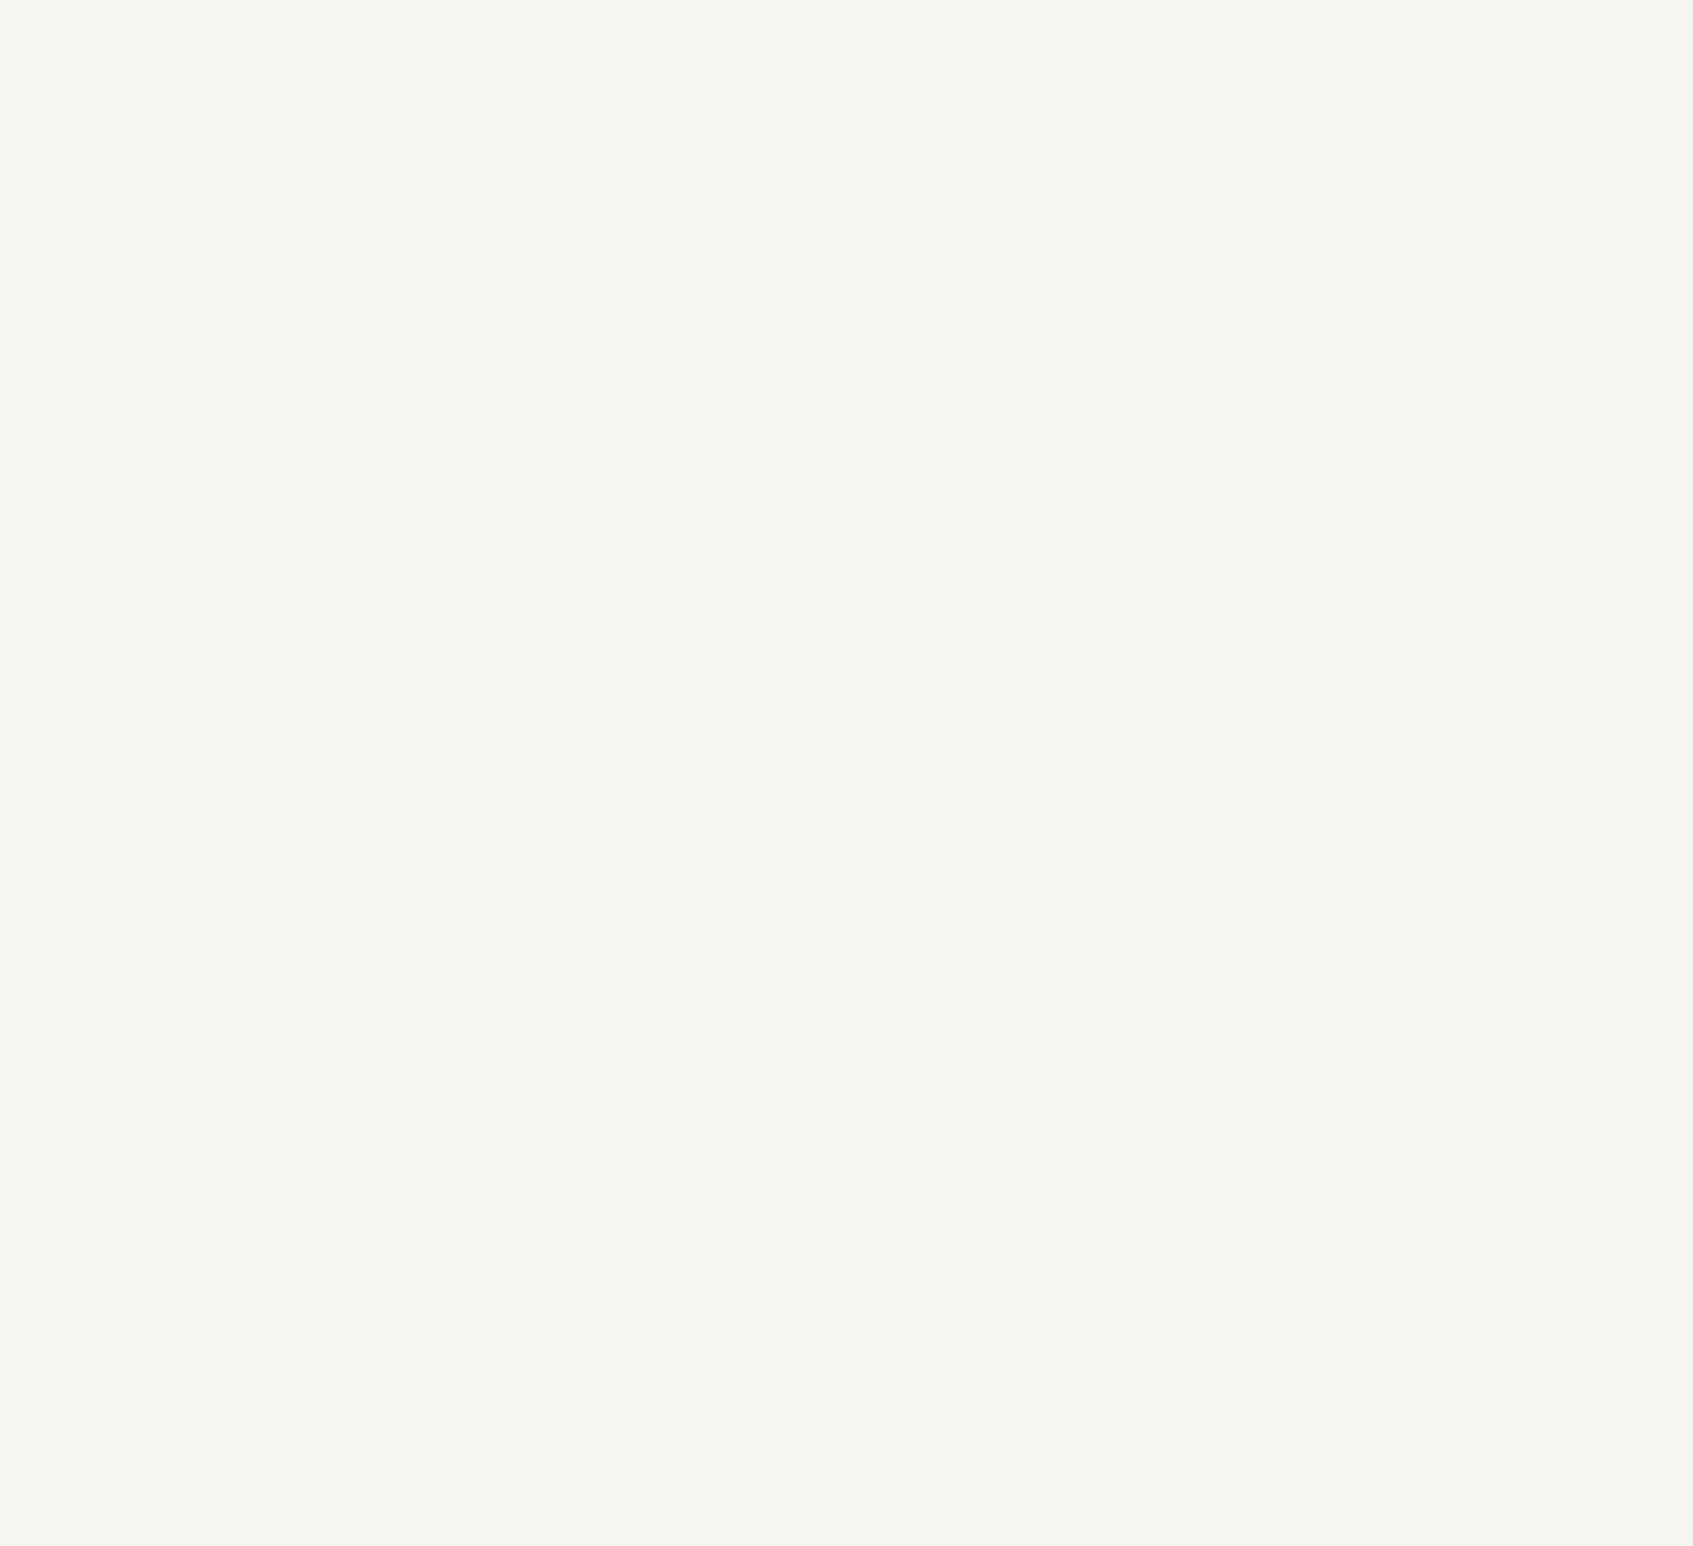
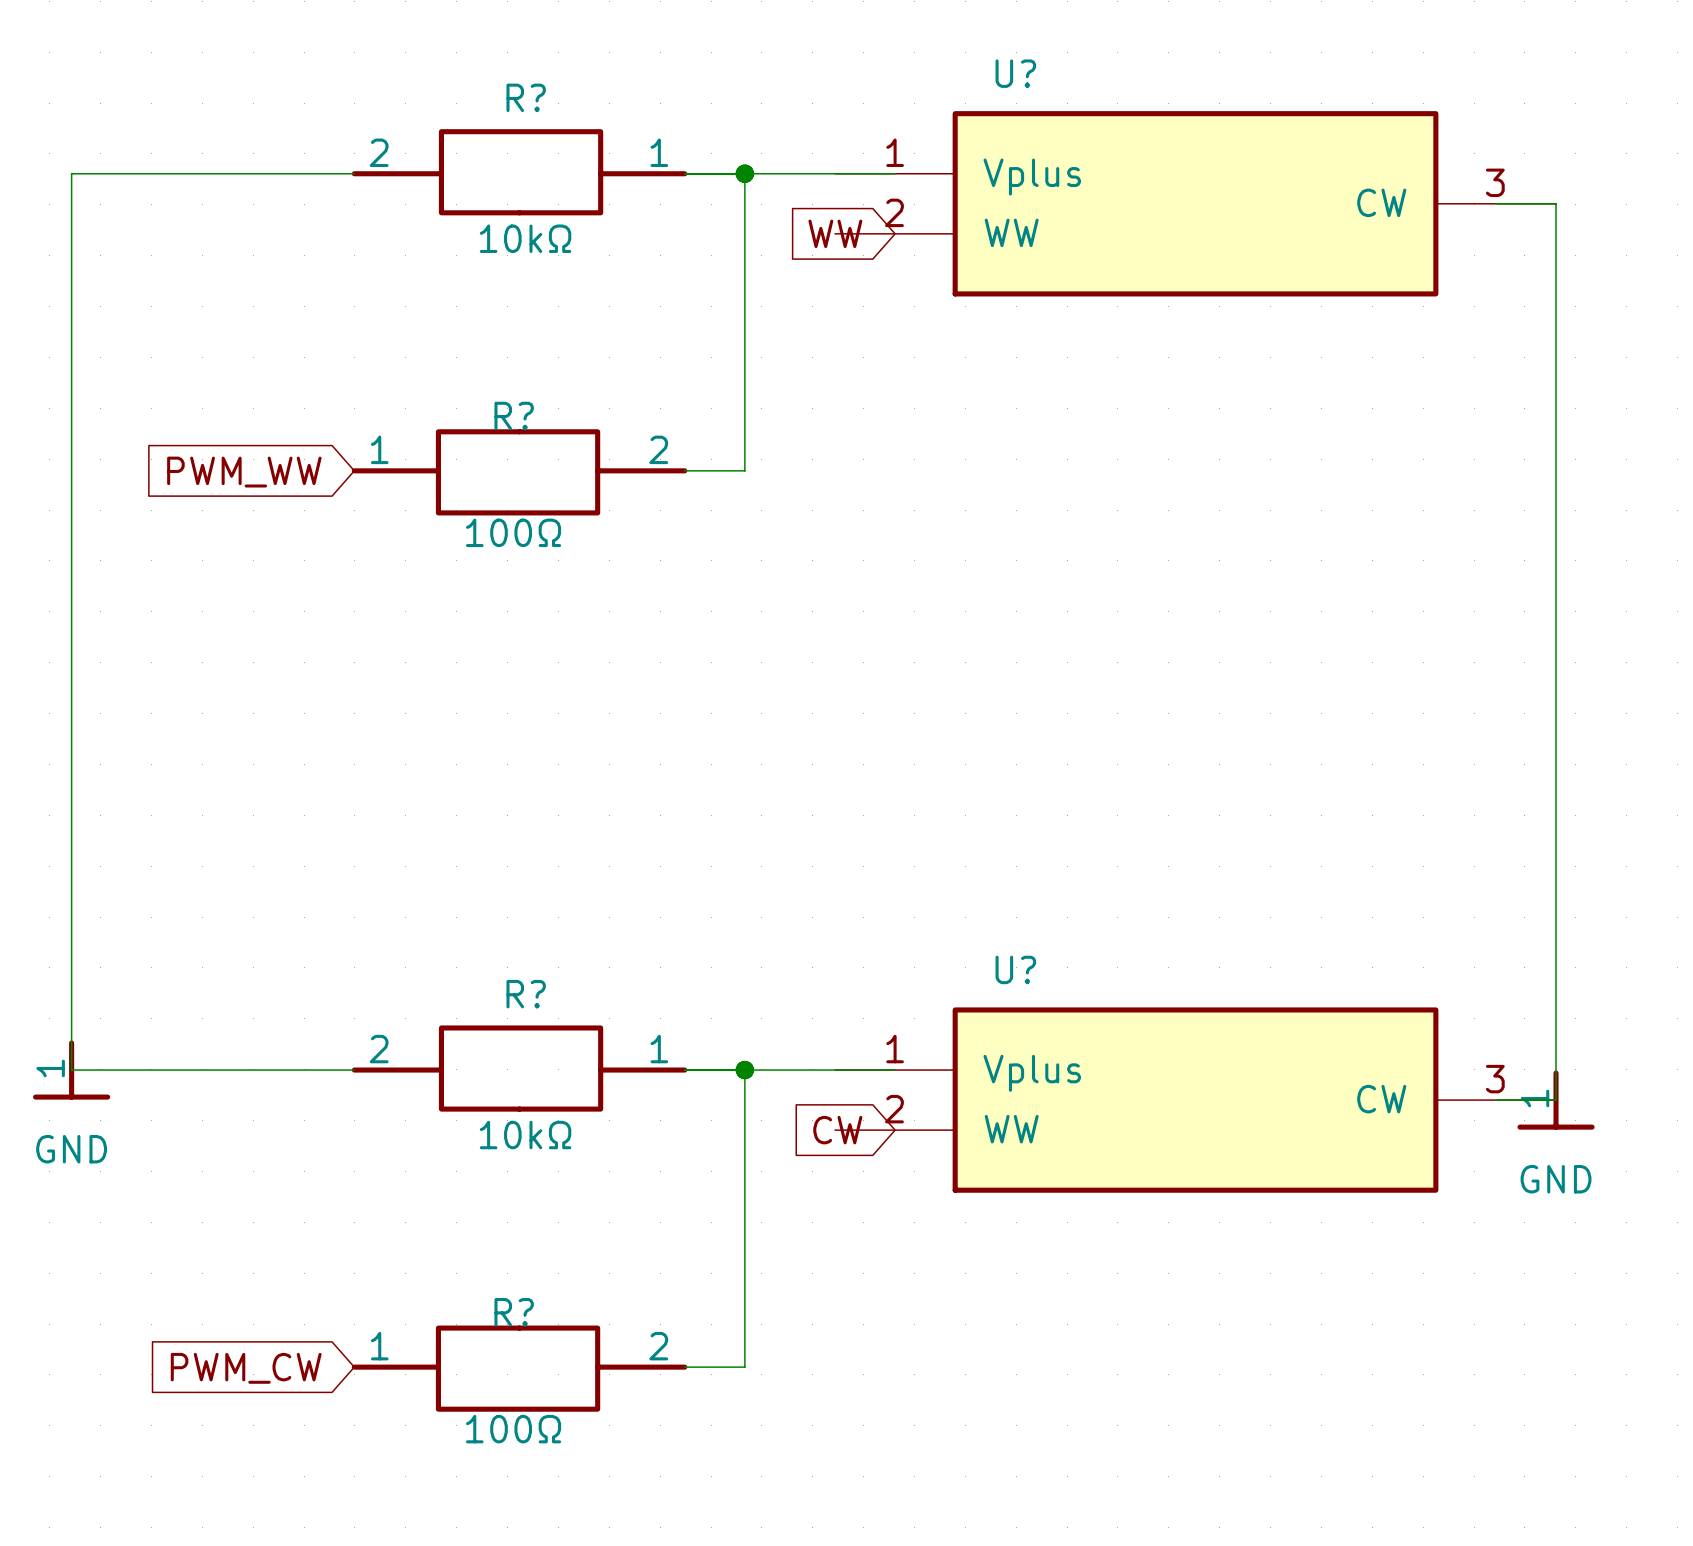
R?: none -> 10kΩ (519, 172)
wire: none -> (354, 173) (71, 173) (71, 1070) (354, 1070)
wire: none -> (684, 173) (895, 173)
wire: none -> (744, 173) (744, 470) (684, 470)
junction: none -> (744, 173)
U?: none -> (1195, 203)
wire: none -> (1495, 203) (1556, 203) (1556, 1100) (1495, 1100)
global label: none -> WW (835, 233)
global label: none -> PWM_WW (244, 472)
R?: none -> 100Ω (519, 472)
R?: none -> 10kΩ (519, 1068)
GND: none -> (71, 1070)
wire: none -> (684, 1070) (895, 1070)
wire: none -> (744, 1070) (744, 1367) (684, 1367)
junction: none -> (744, 1070)
U?: none -> (1195, 1100)
GND: none -> (1556, 1100)
global label: none -> CW (837, 1130)
global label: none -> PWM_CW (246, 1368)
R?: none -> 100Ω (519, 1368)

